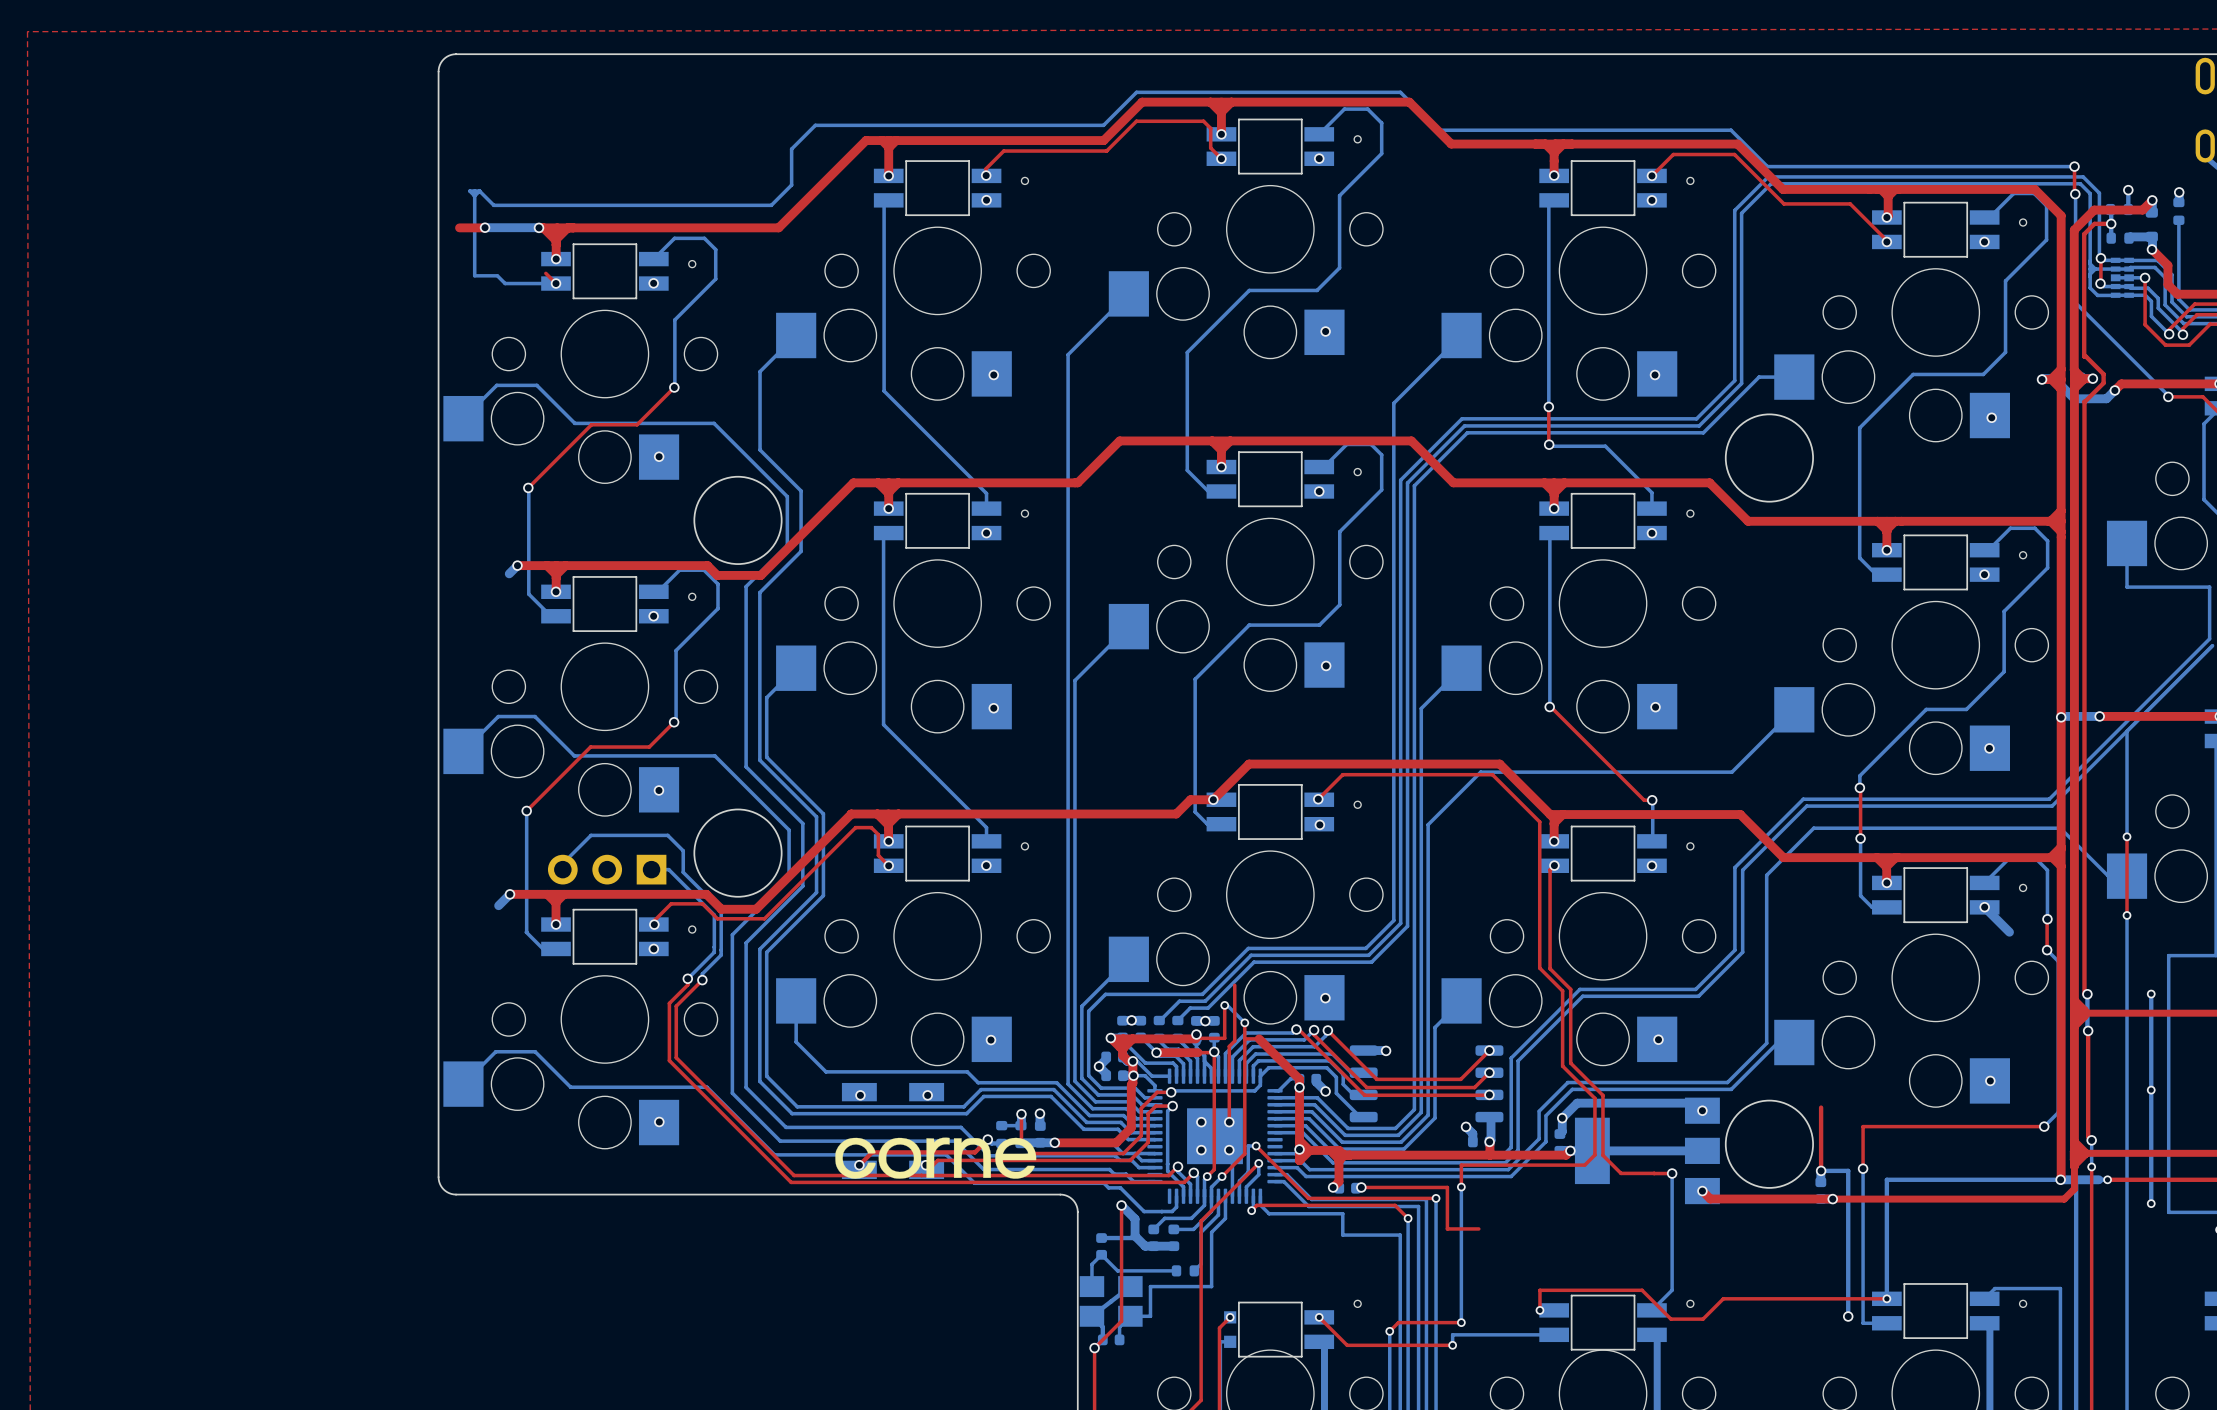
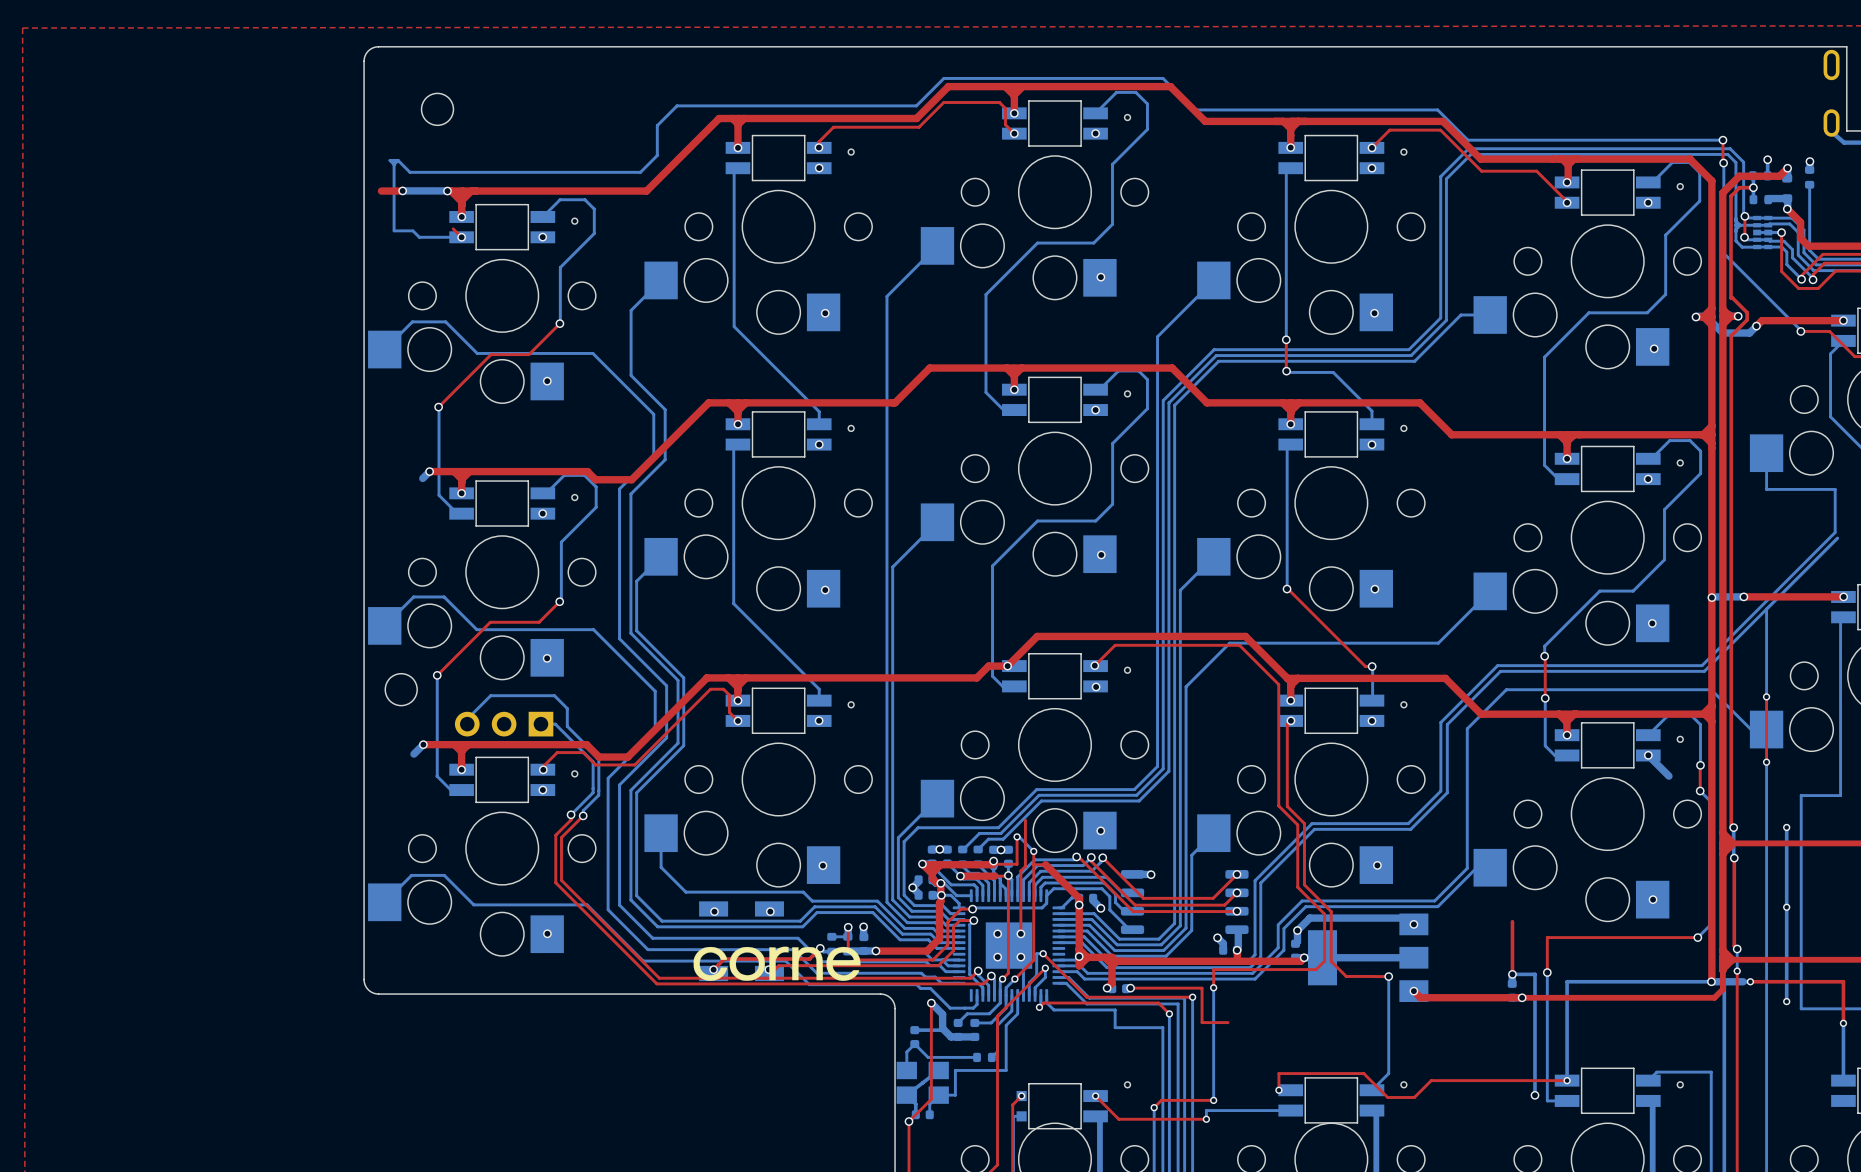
round board edge: none -> [420, 92, 455, 127]
round board edge: [1724, 413, 1814, 503] -> none
round board edge: [693, 475, 783, 565] -> none
round board edge: none -> [384, 672, 418, 707]
round board edge: [693, 808, 783, 898] -> none
round board edge: [1724, 1099, 1814, 1189] -> none

